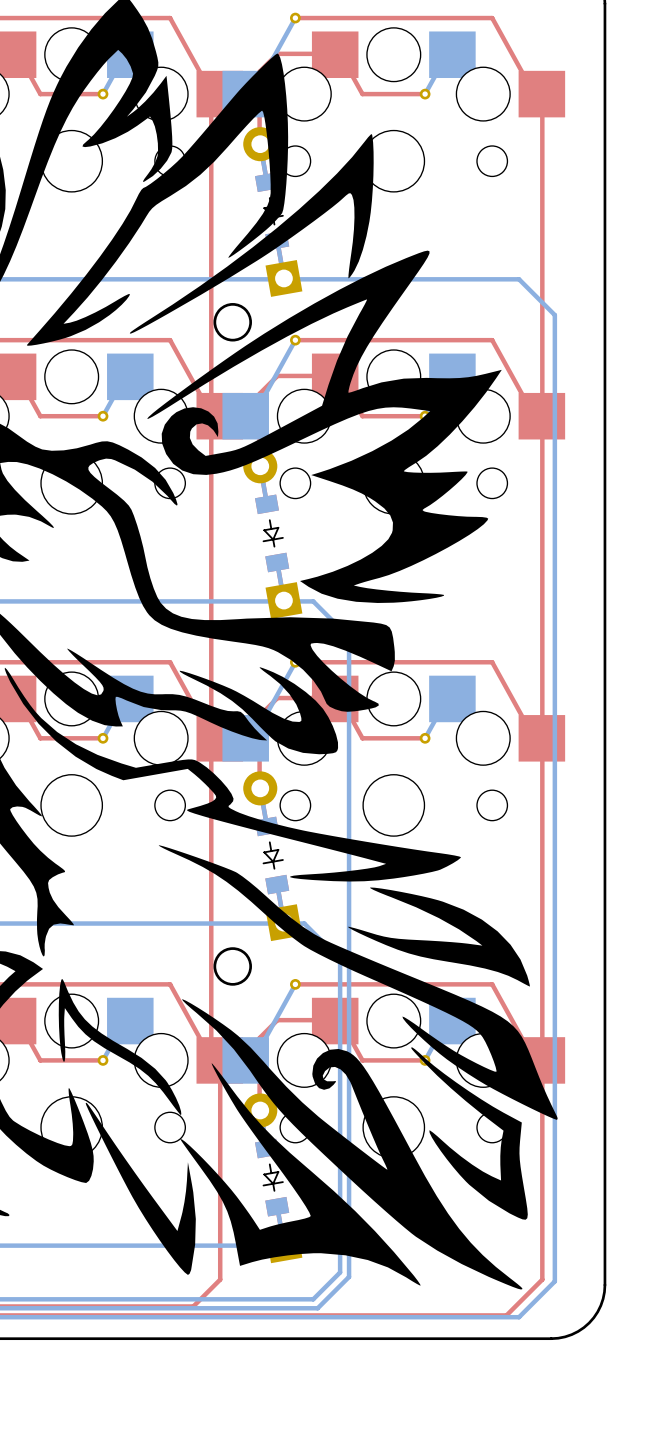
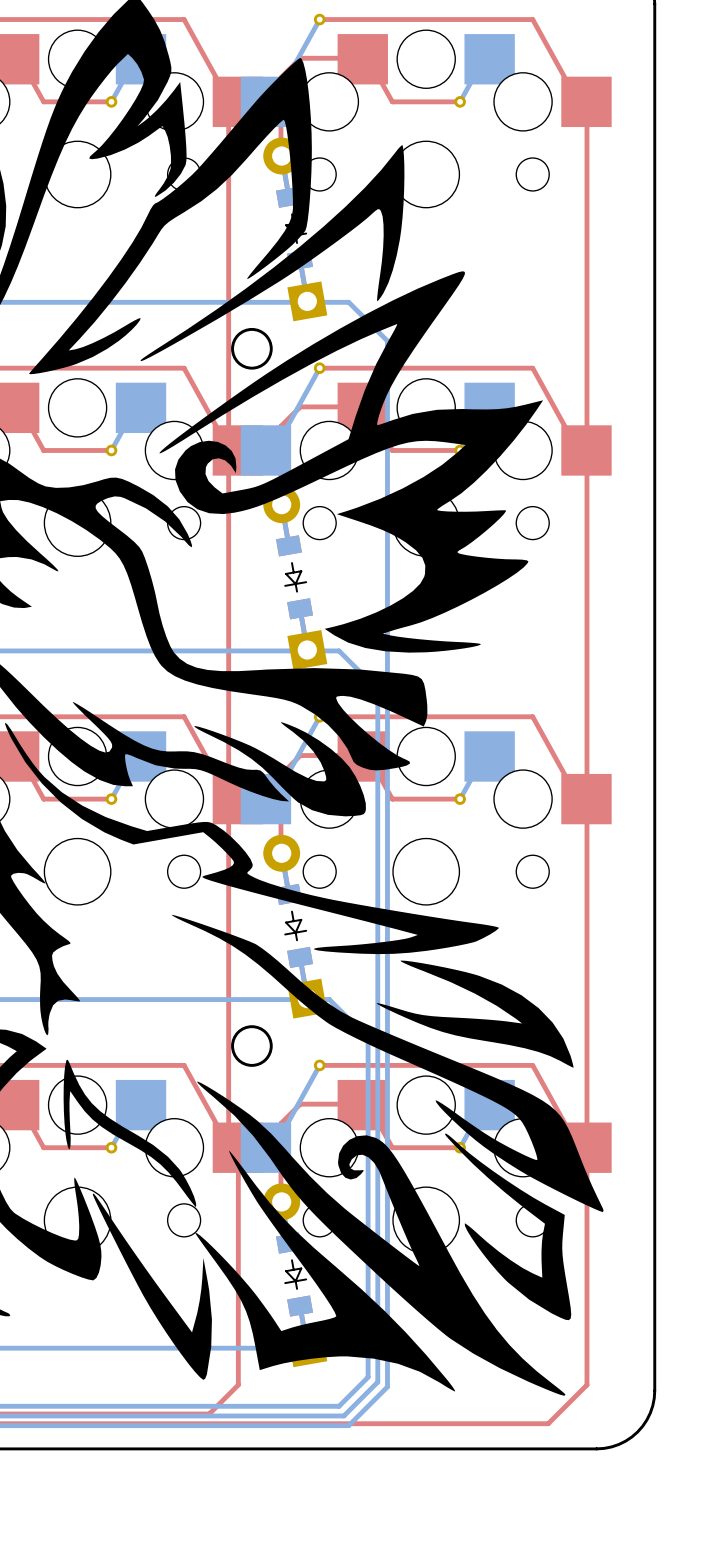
bottom track: (322, 279) (519, 279) (554, 315) (554, 1281) (519, 1317) (322, 1317) -> (348, 302) (387, 341) (387, 1386) (348, 1425)

